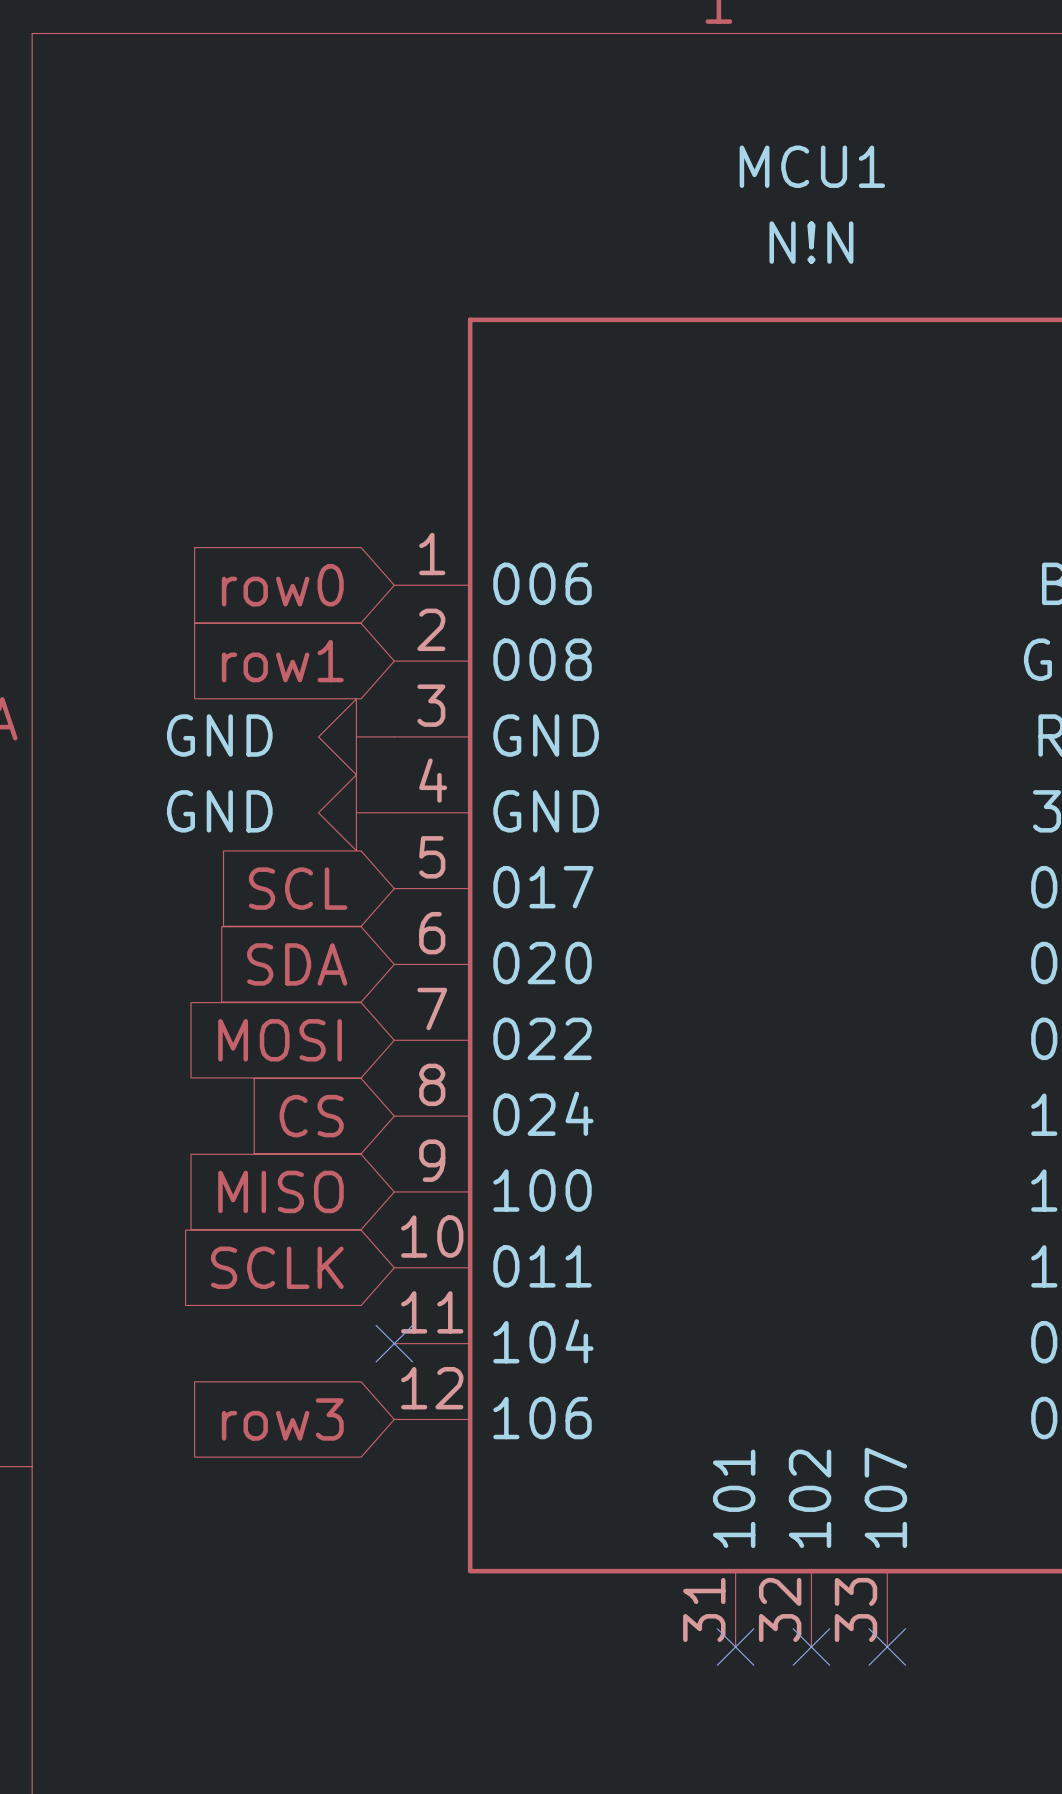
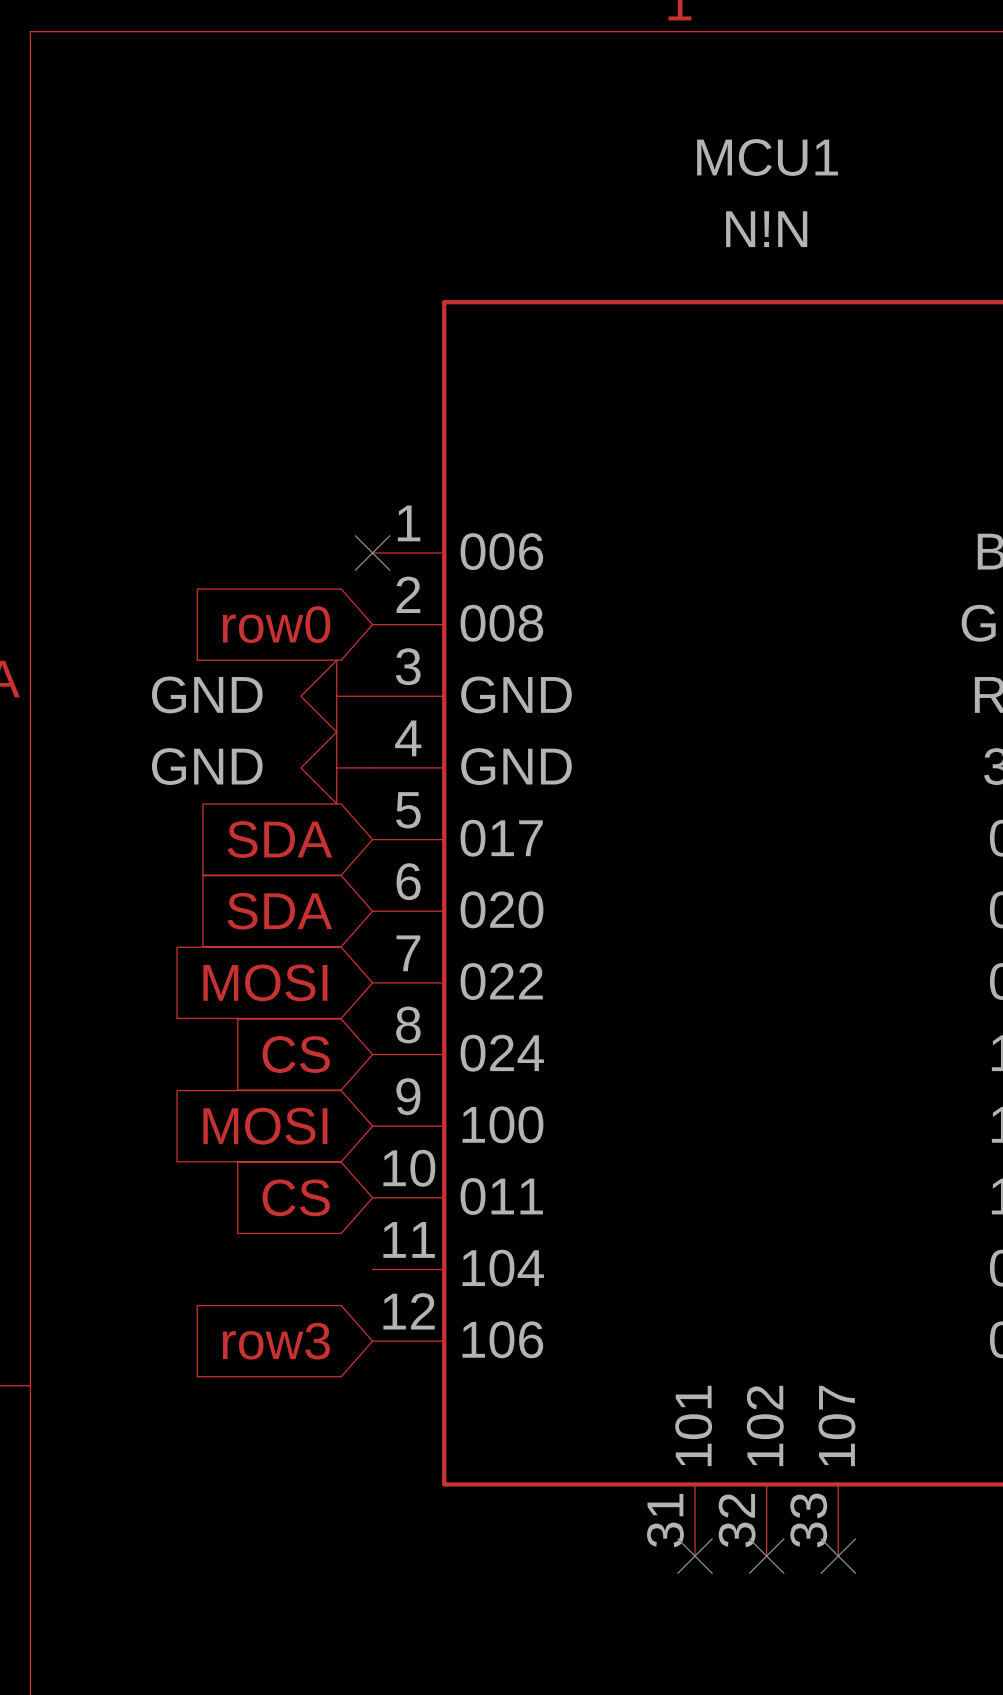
global label: row0 (282, 585) -> none
no-connect mark: none -> (372, 552)
global label: row1 (282, 661) -> row0 (276, 624)
global label: SCL (298, 888) -> SDA (279, 839)
global label: MISO (280, 1191) -> MOSI (265, 1126)
global label: SCLK (277, 1267) -> CS (296, 1197)
no-connect mark: (394, 1343) -> none

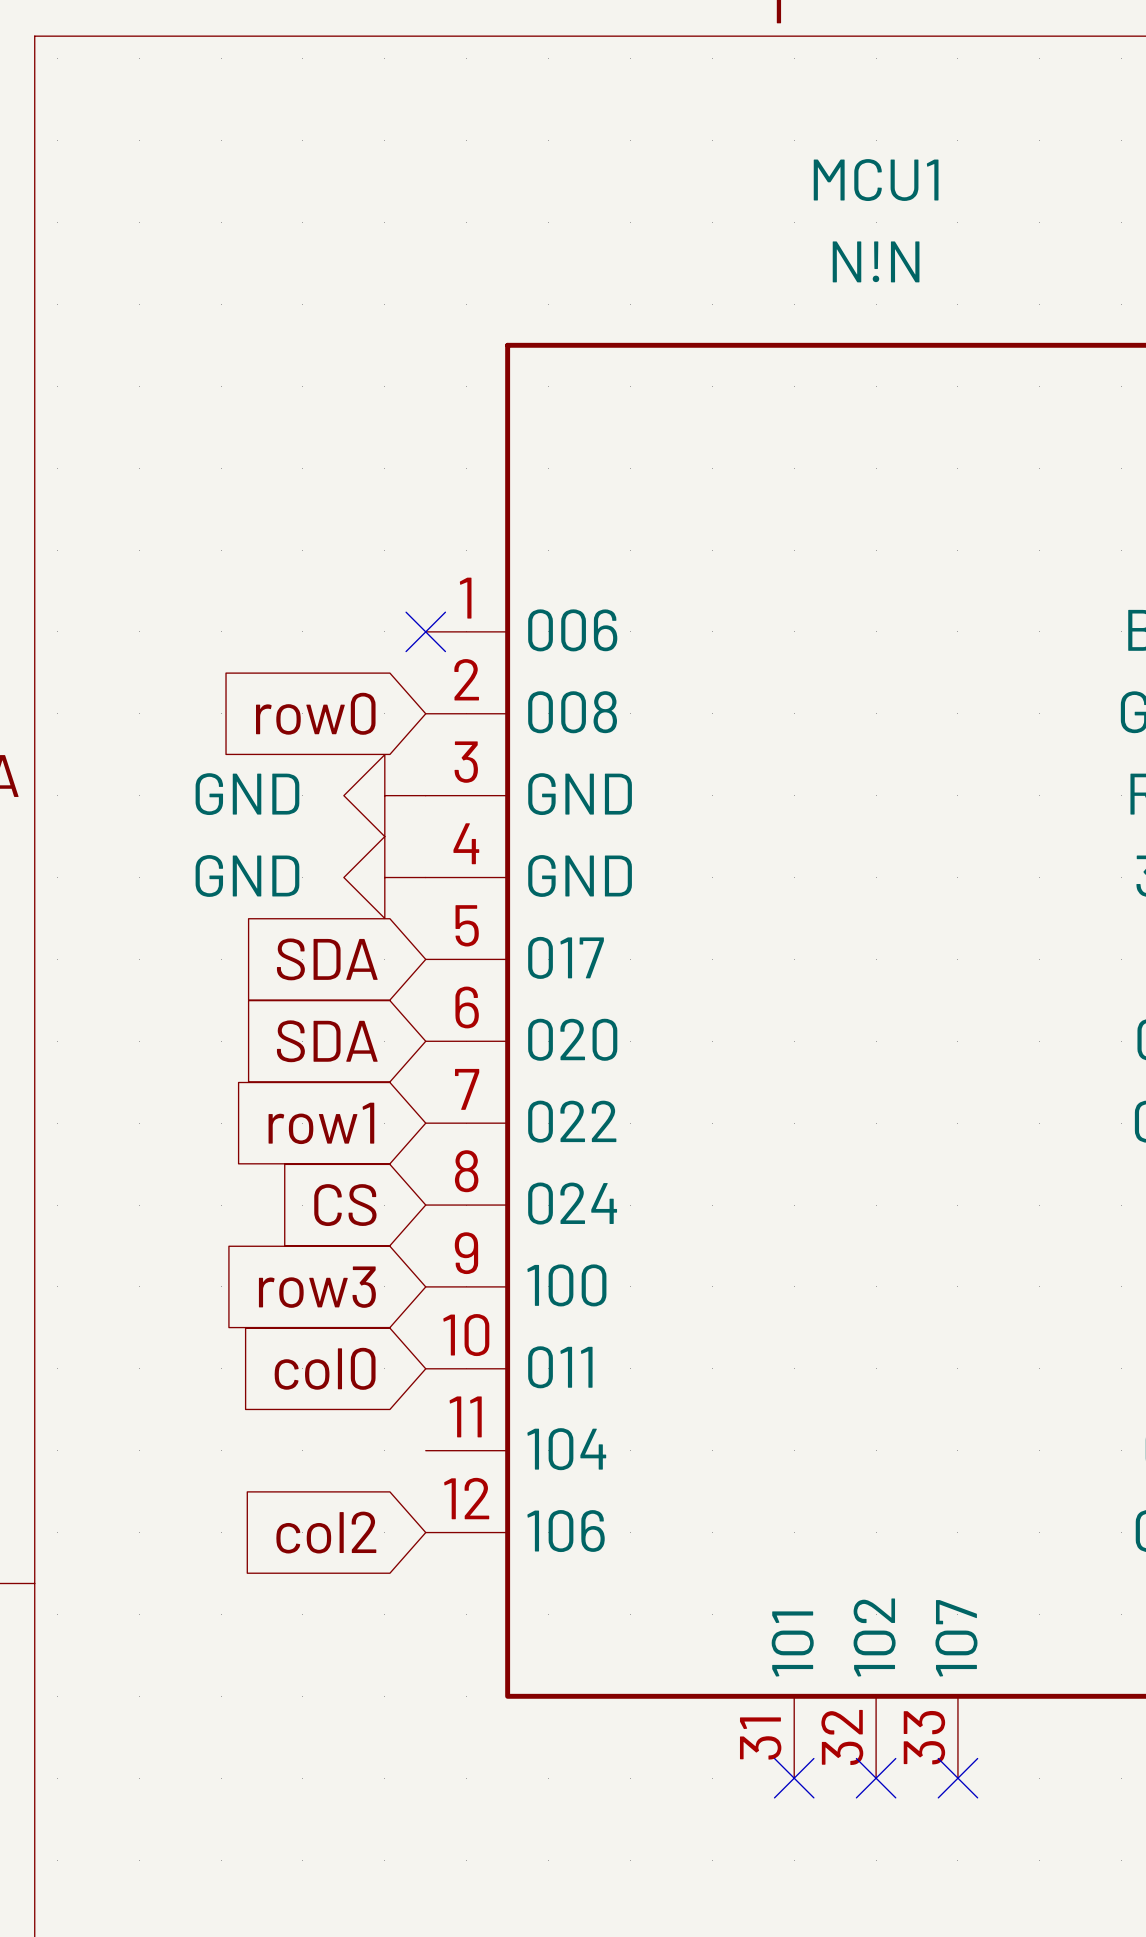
global label: MOSI (265, 982) -> row1 (321, 1123)
global label: MOSI (265, 1126) -> row3 (317, 1287)
global label: CS (296, 1197) -> col0 (325, 1368)
global label: row3 (276, 1341) -> col2 (326, 1532)

